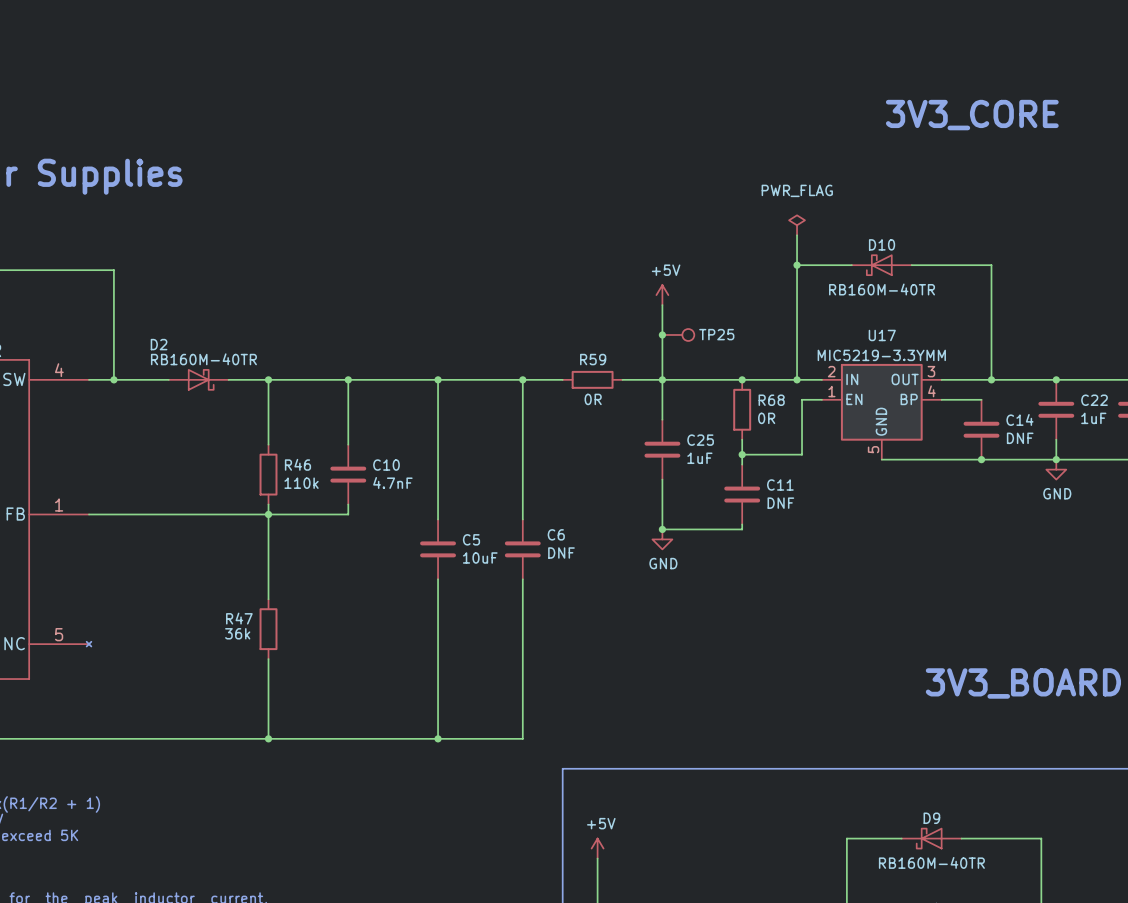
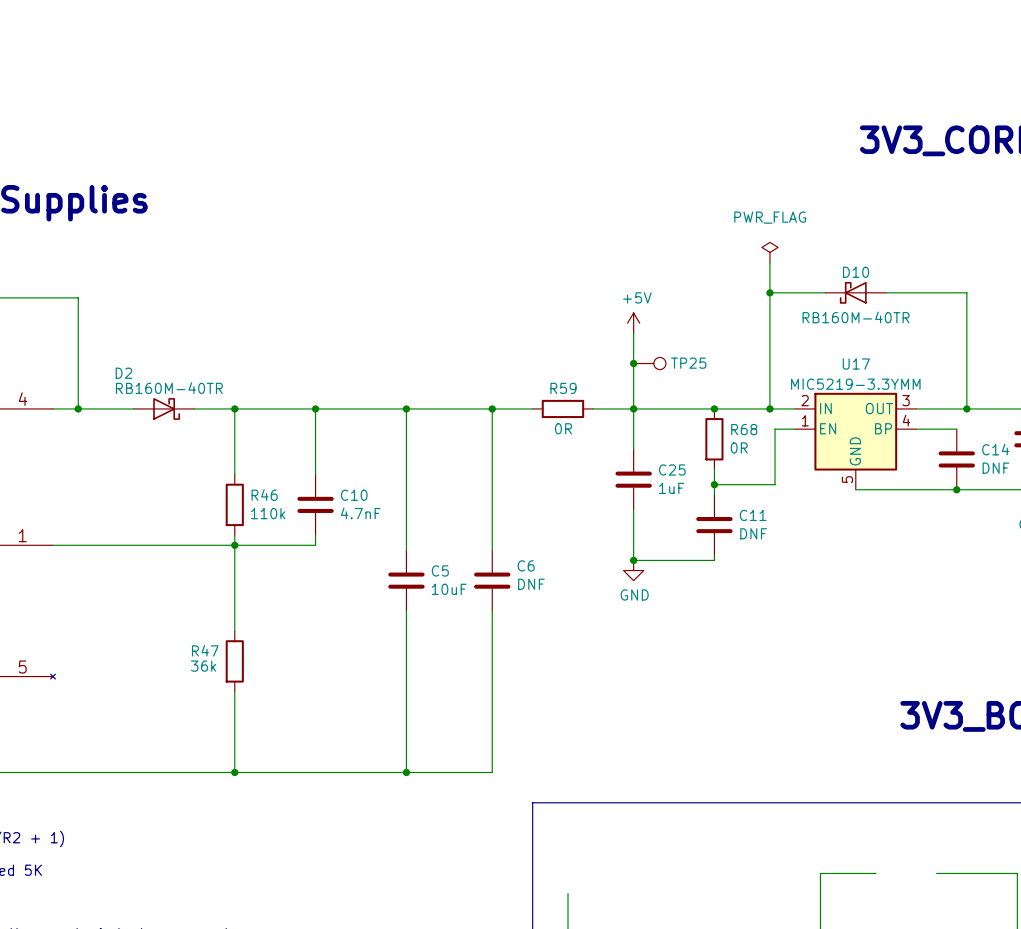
D9: RB160M-40TR (931, 838) -> none
power symbol: +5V (597, 848) -> none

